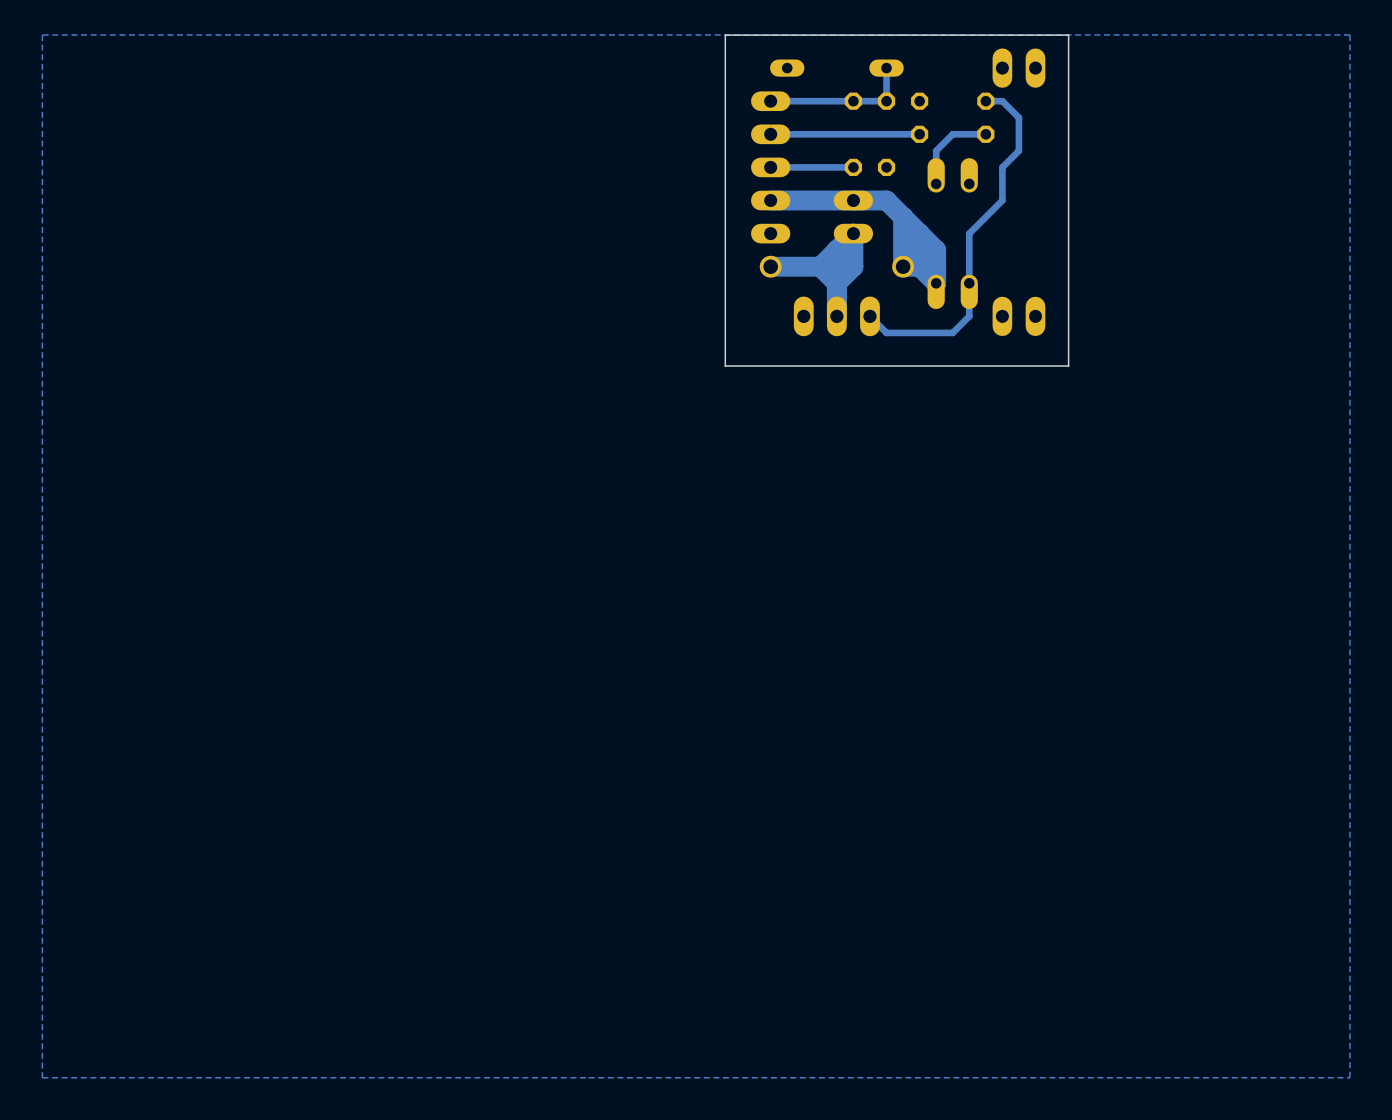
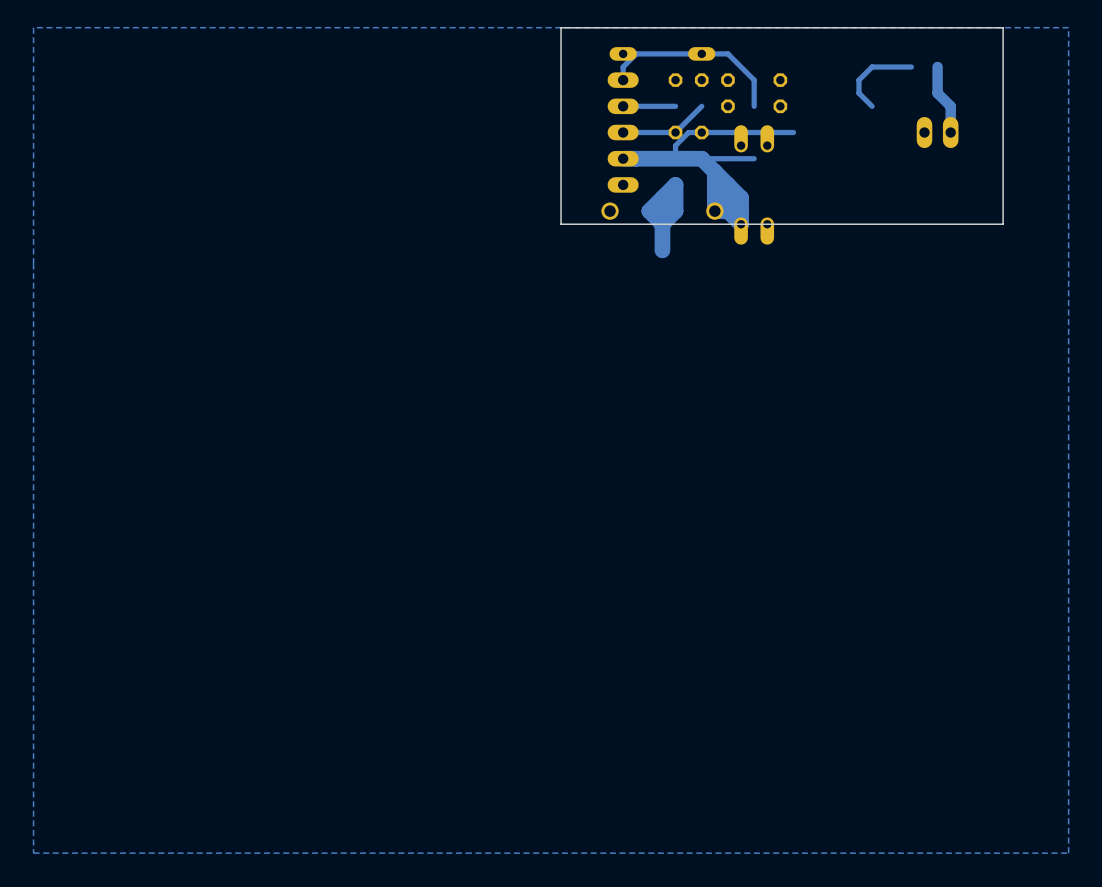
board edge: (1068, 35) (1068, 366) (725, 366) (725, 35) -> (845, 27) (1003, 27) (1003, 224) (561, 224) (561, 27) (574, 27)
track: (886, 68) (886, 101) (770, 101) -> none
part: (1018, 68) -> none
track: none -> (911, 67) (872, 67) (858, 80) (858, 93) (872, 106)
track: none -> (937, 67) (937, 93) (950, 106) (950, 132)
track: none -> (623, 80) (623, 67) (636, 53) (727, 53) (754, 80) (754, 106)
track: (985, 101) (1002, 101) (1018, 117) (1018, 150) (1002, 167) (1002, 200) (969, 233) (969, 316) (952, 332) (886, 332) (869, 316) -> none
track: none -> (701, 106) (675, 132)
track: (919, 134) (853, 134) -> (754, 158) (701, 158)
track: (985, 134) (952, 134) (936, 150) (936, 183) -> none
part position: (770, 167) -> (623, 132)
track: none -> (793, 132) (688, 132) (675, 145) (675, 158)
part: none -> (937, 132)
part: (853, 217) -> none
track: (820, 266) (770, 266) -> none
part: (836, 316) -> none
part: (1018, 316) -> none

